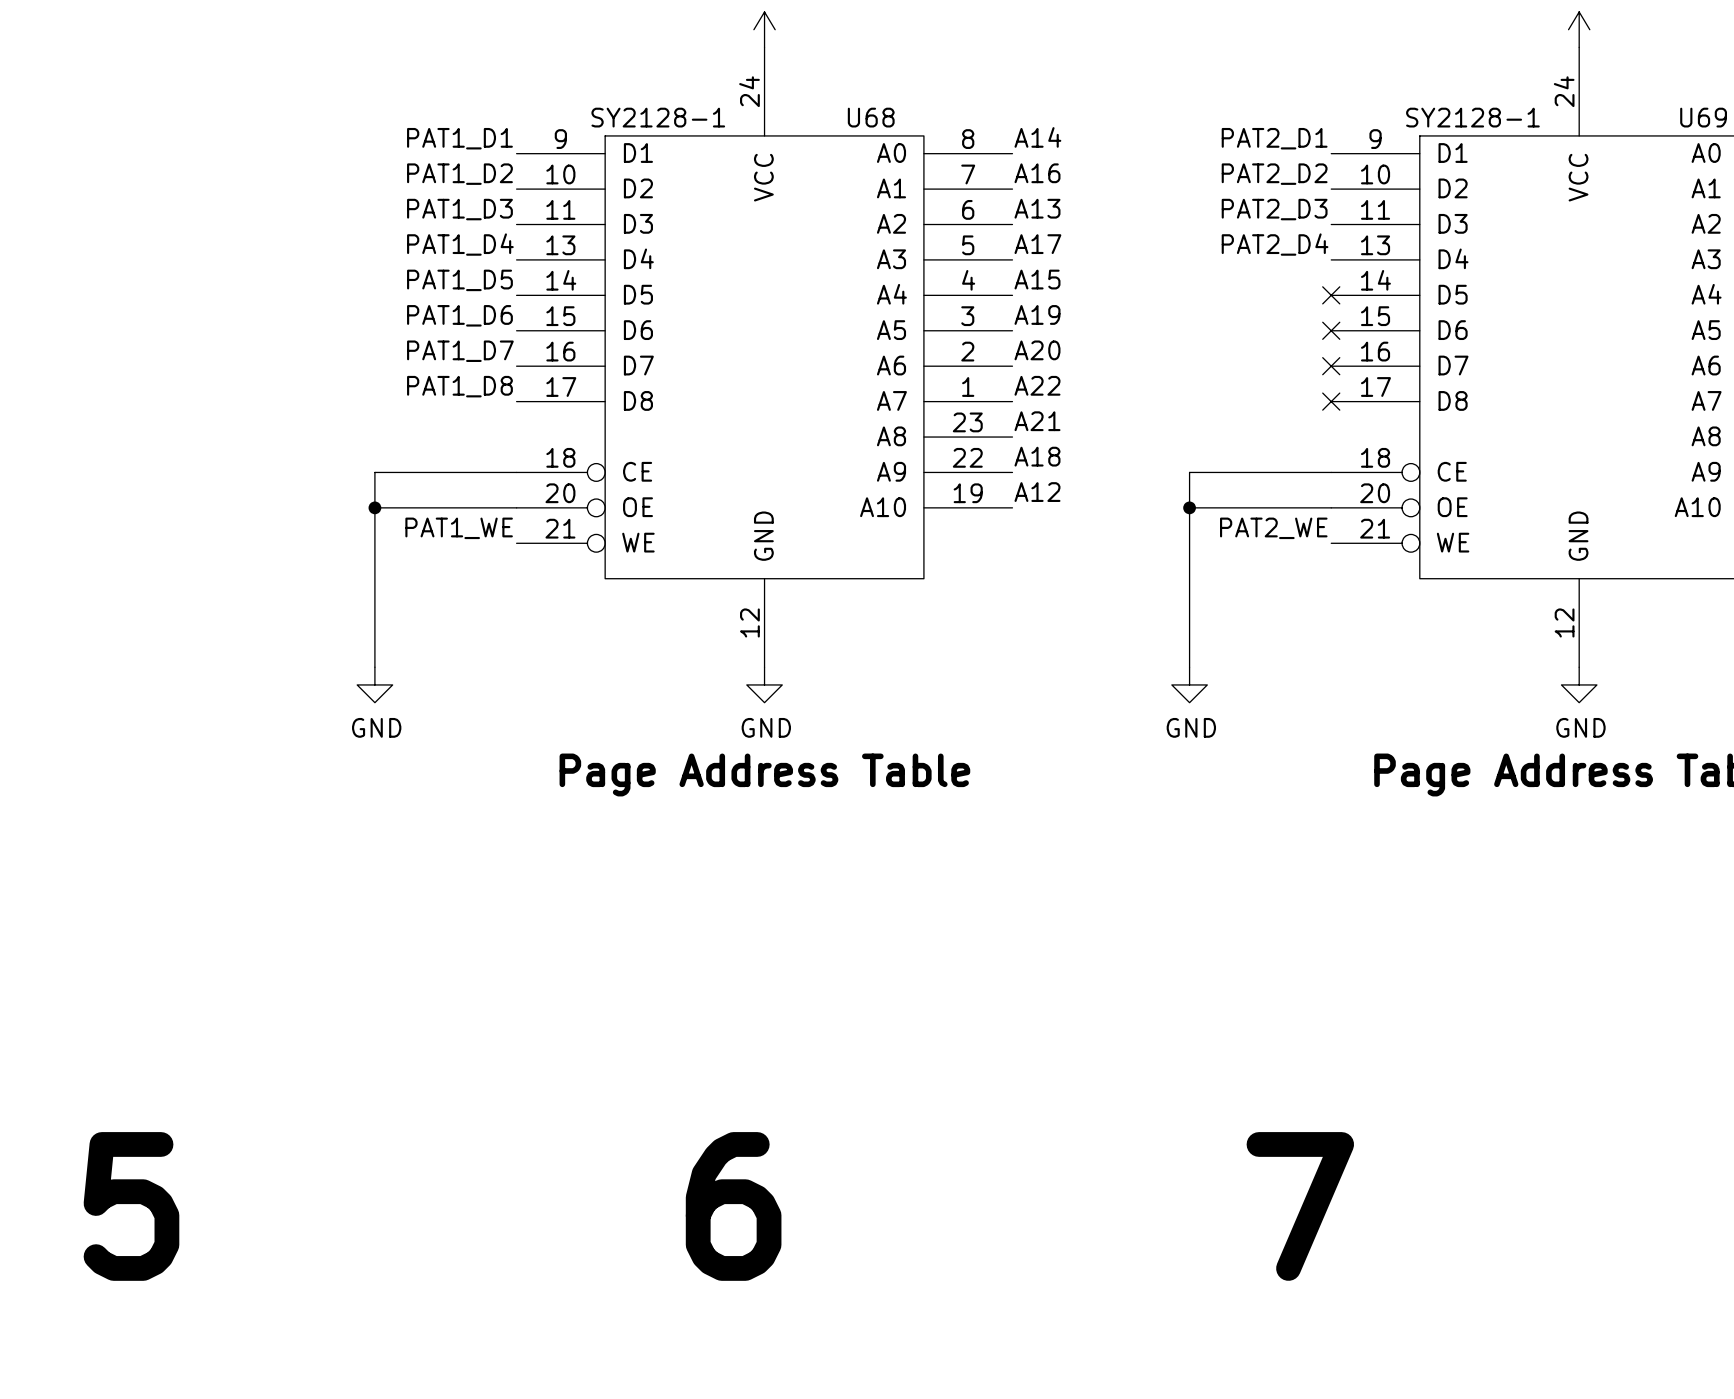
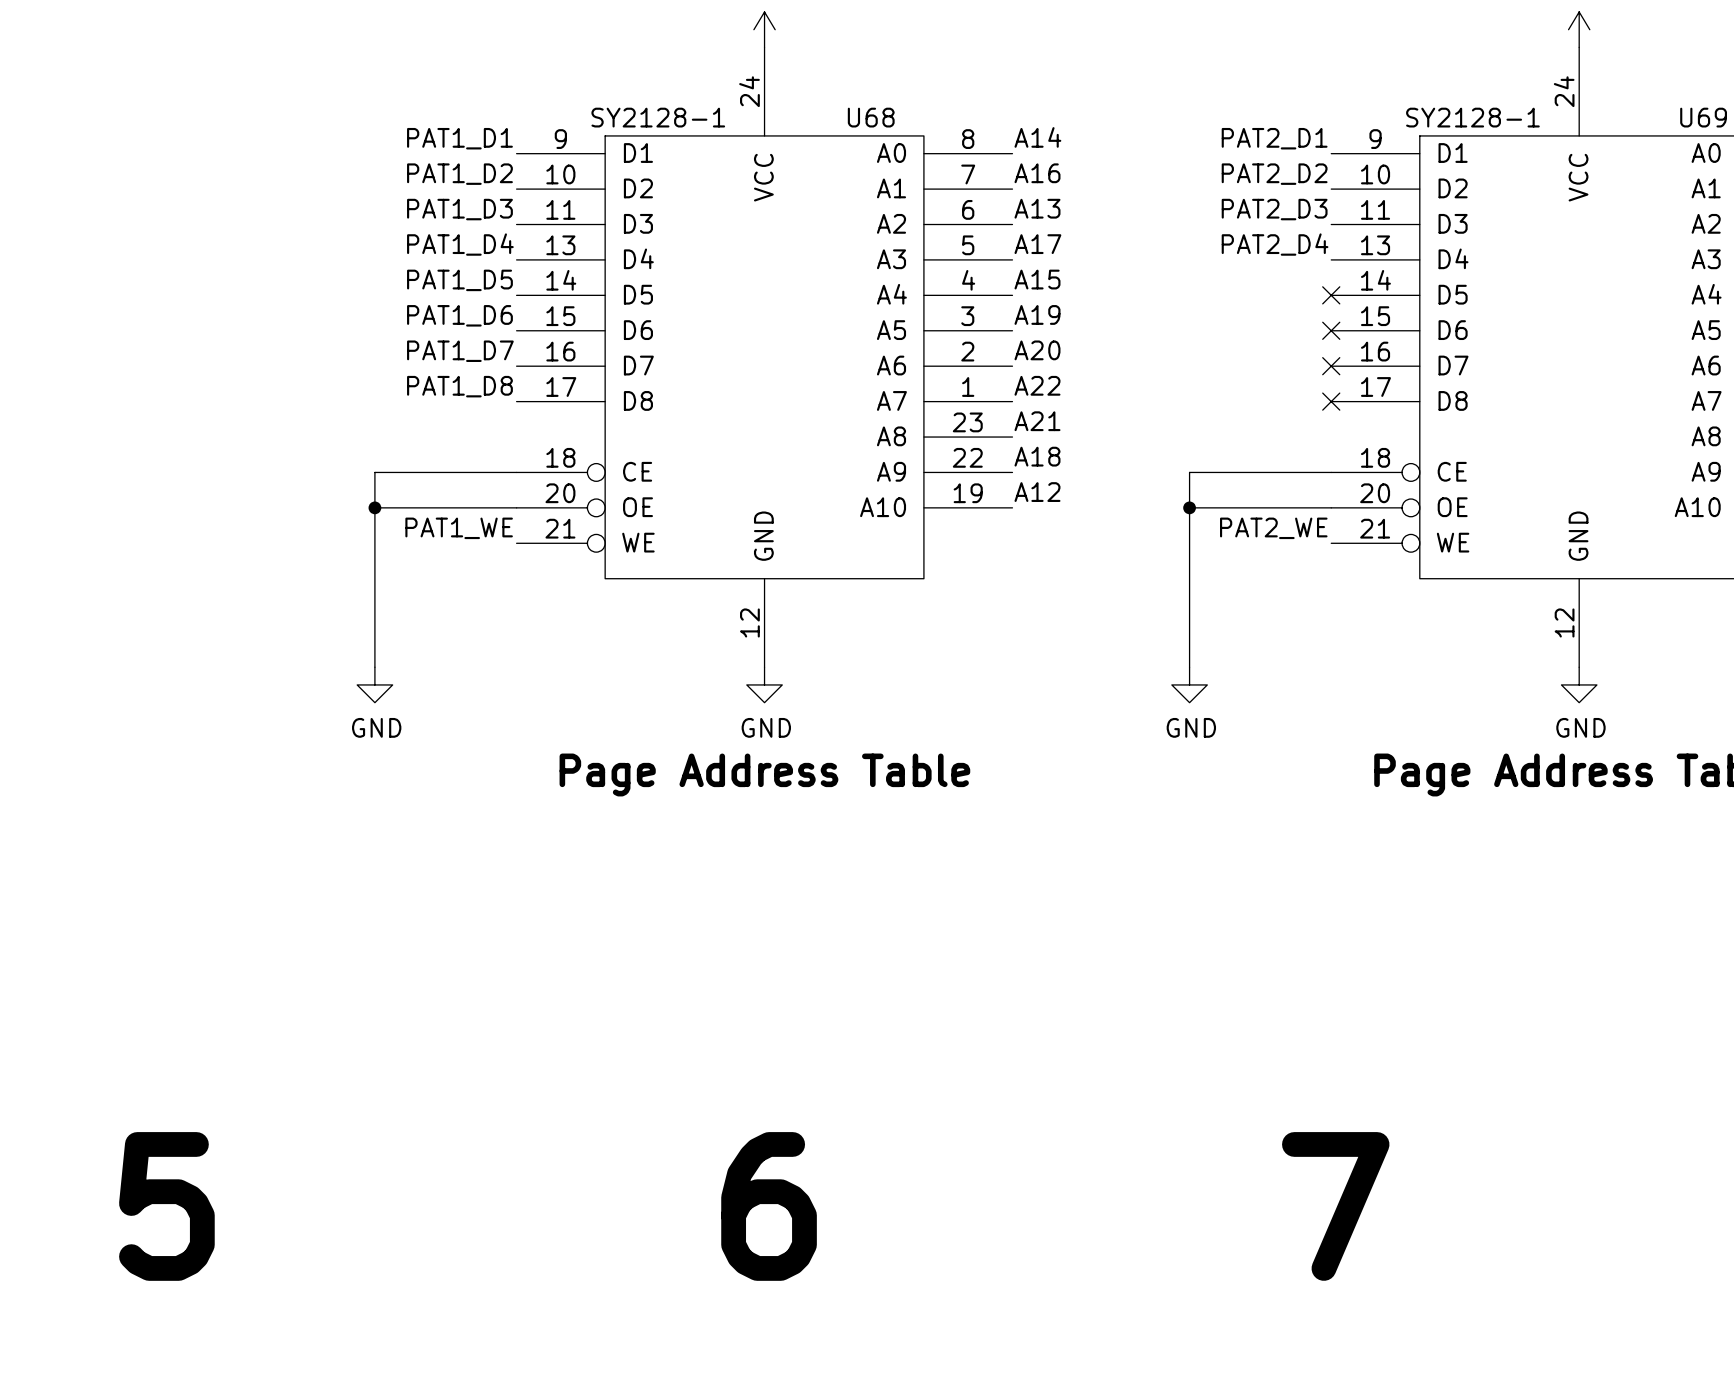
text position: 5 (131, 1206) -> 5 (166, 1206)
text position: 6 (733, 1206) -> 6 (769, 1206)
text position: 7 (1300, 1206) -> 7 (1335, 1206)

